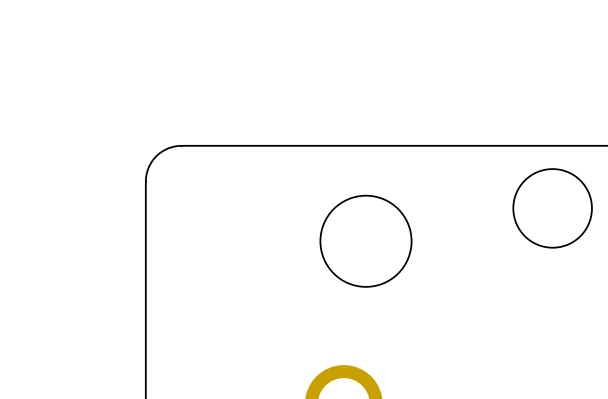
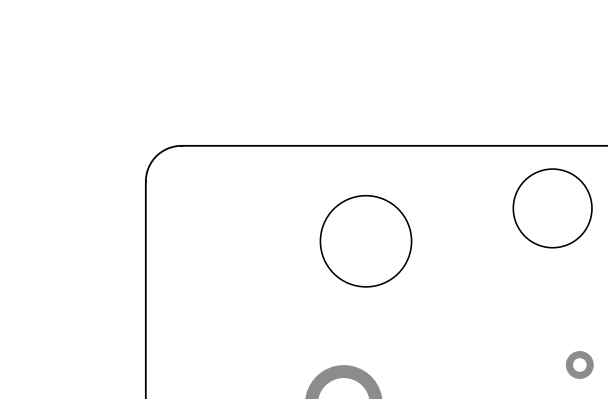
via: none -> (579, 365)

